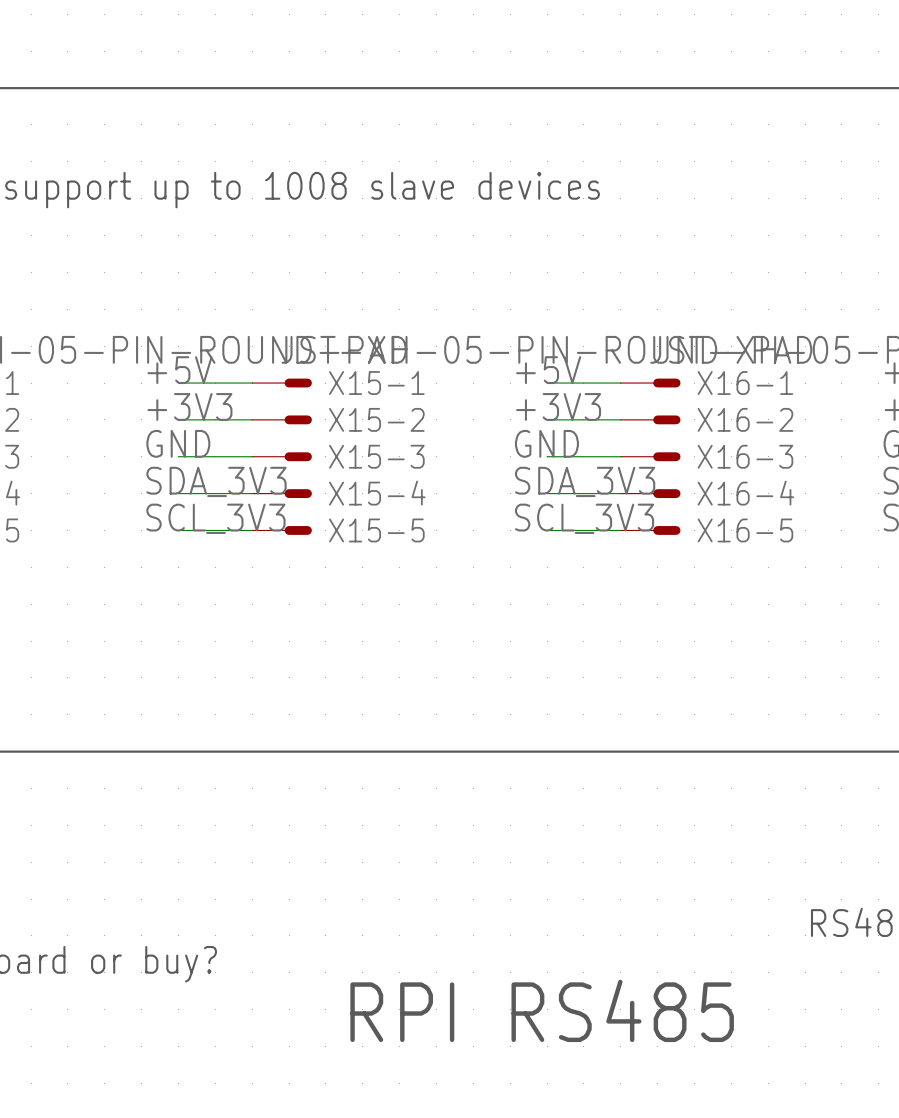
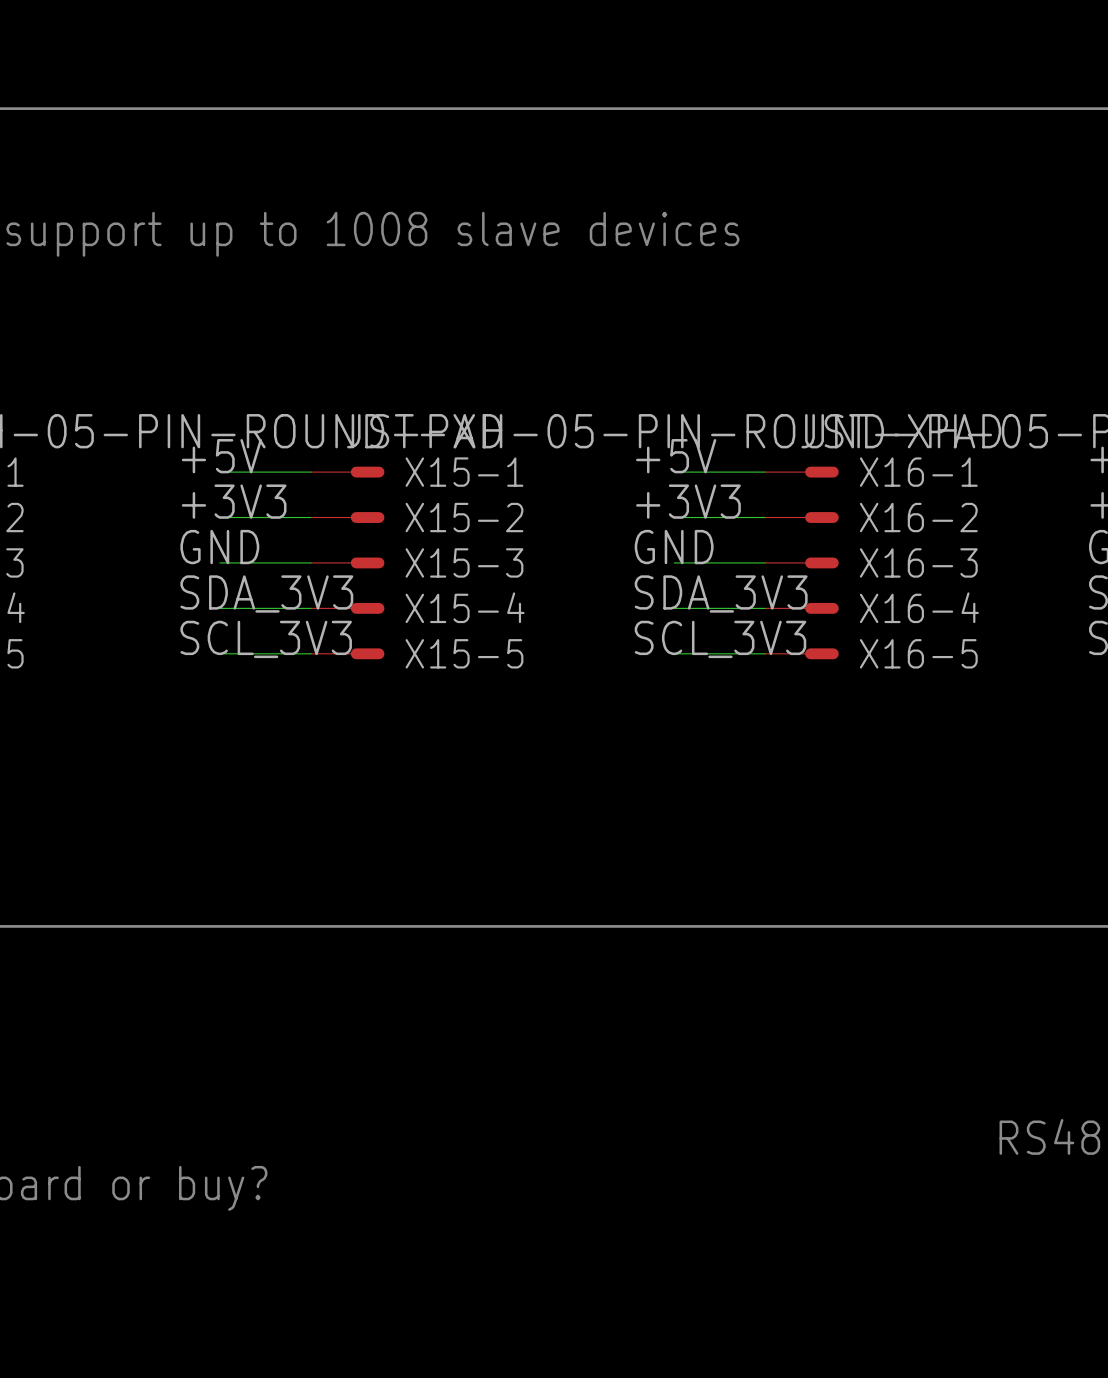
text: RPI RS485 (542, 1010) -> none

